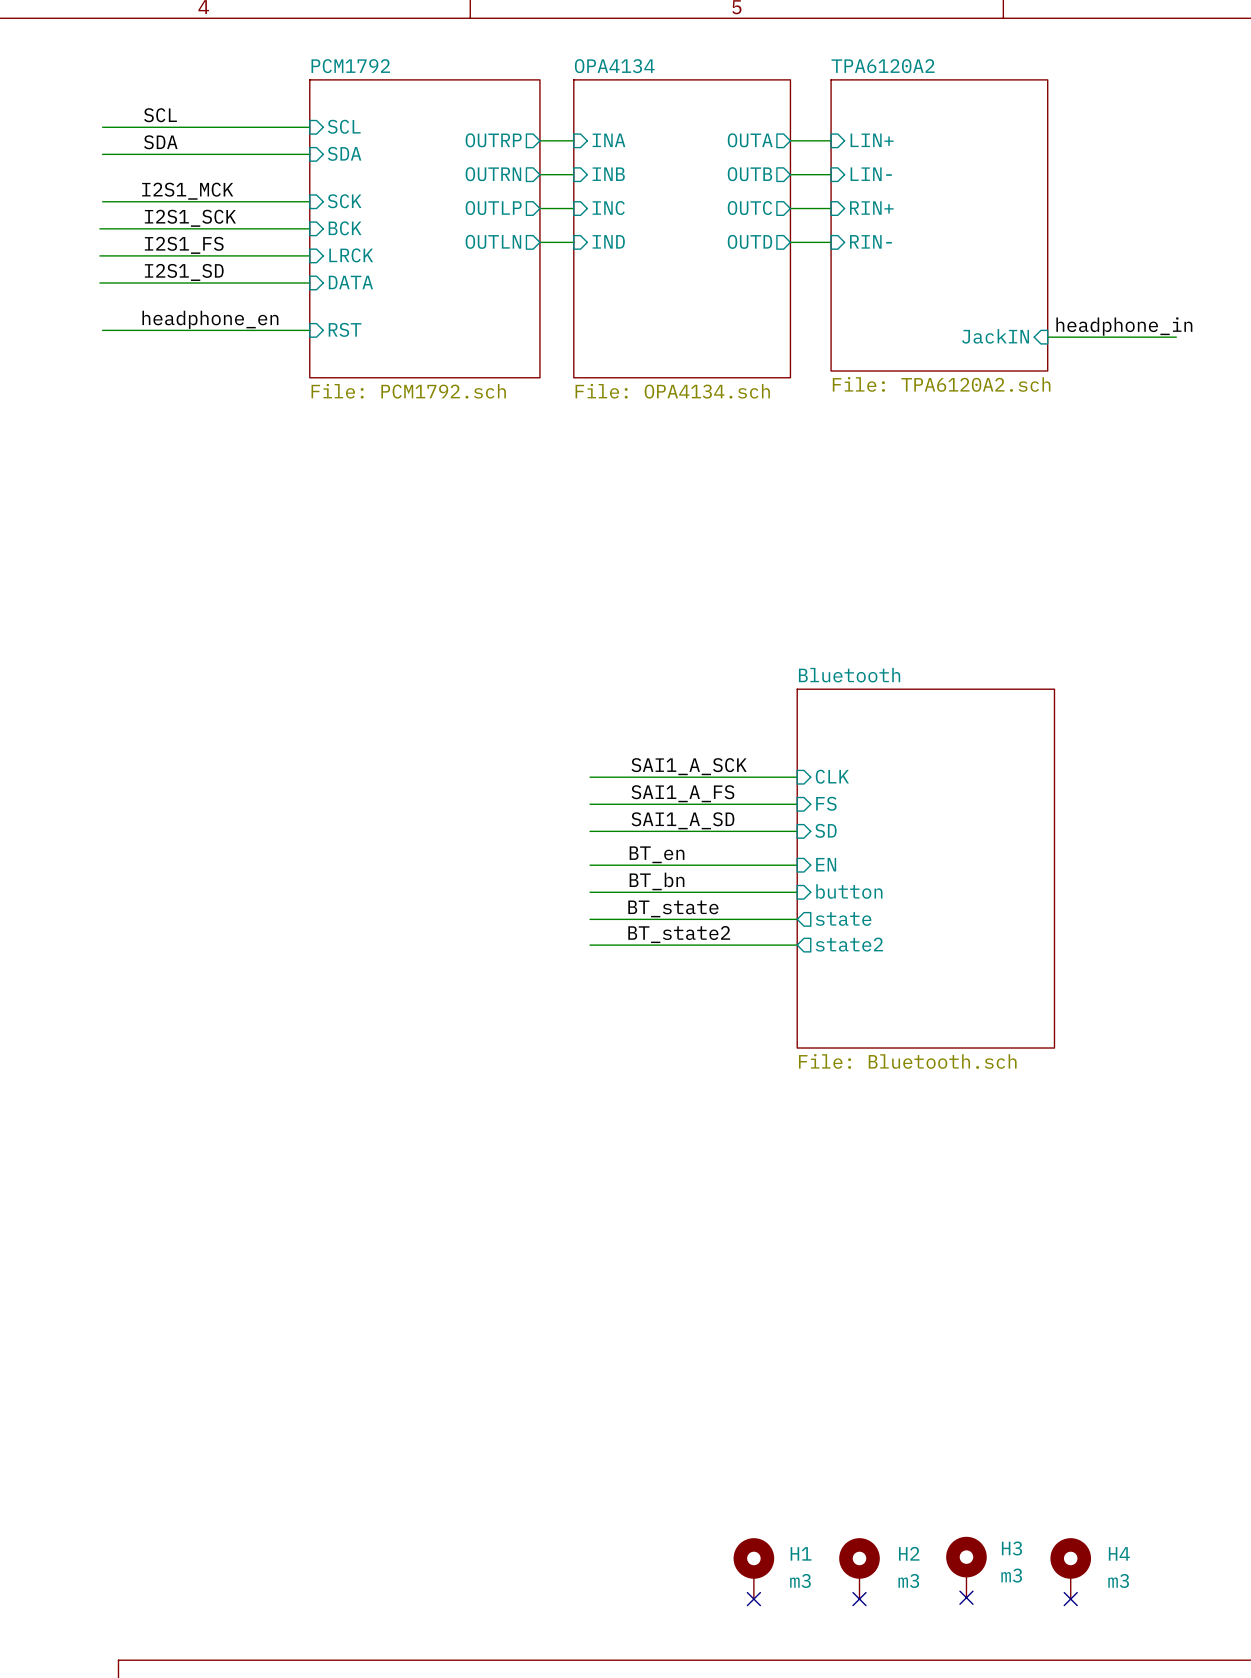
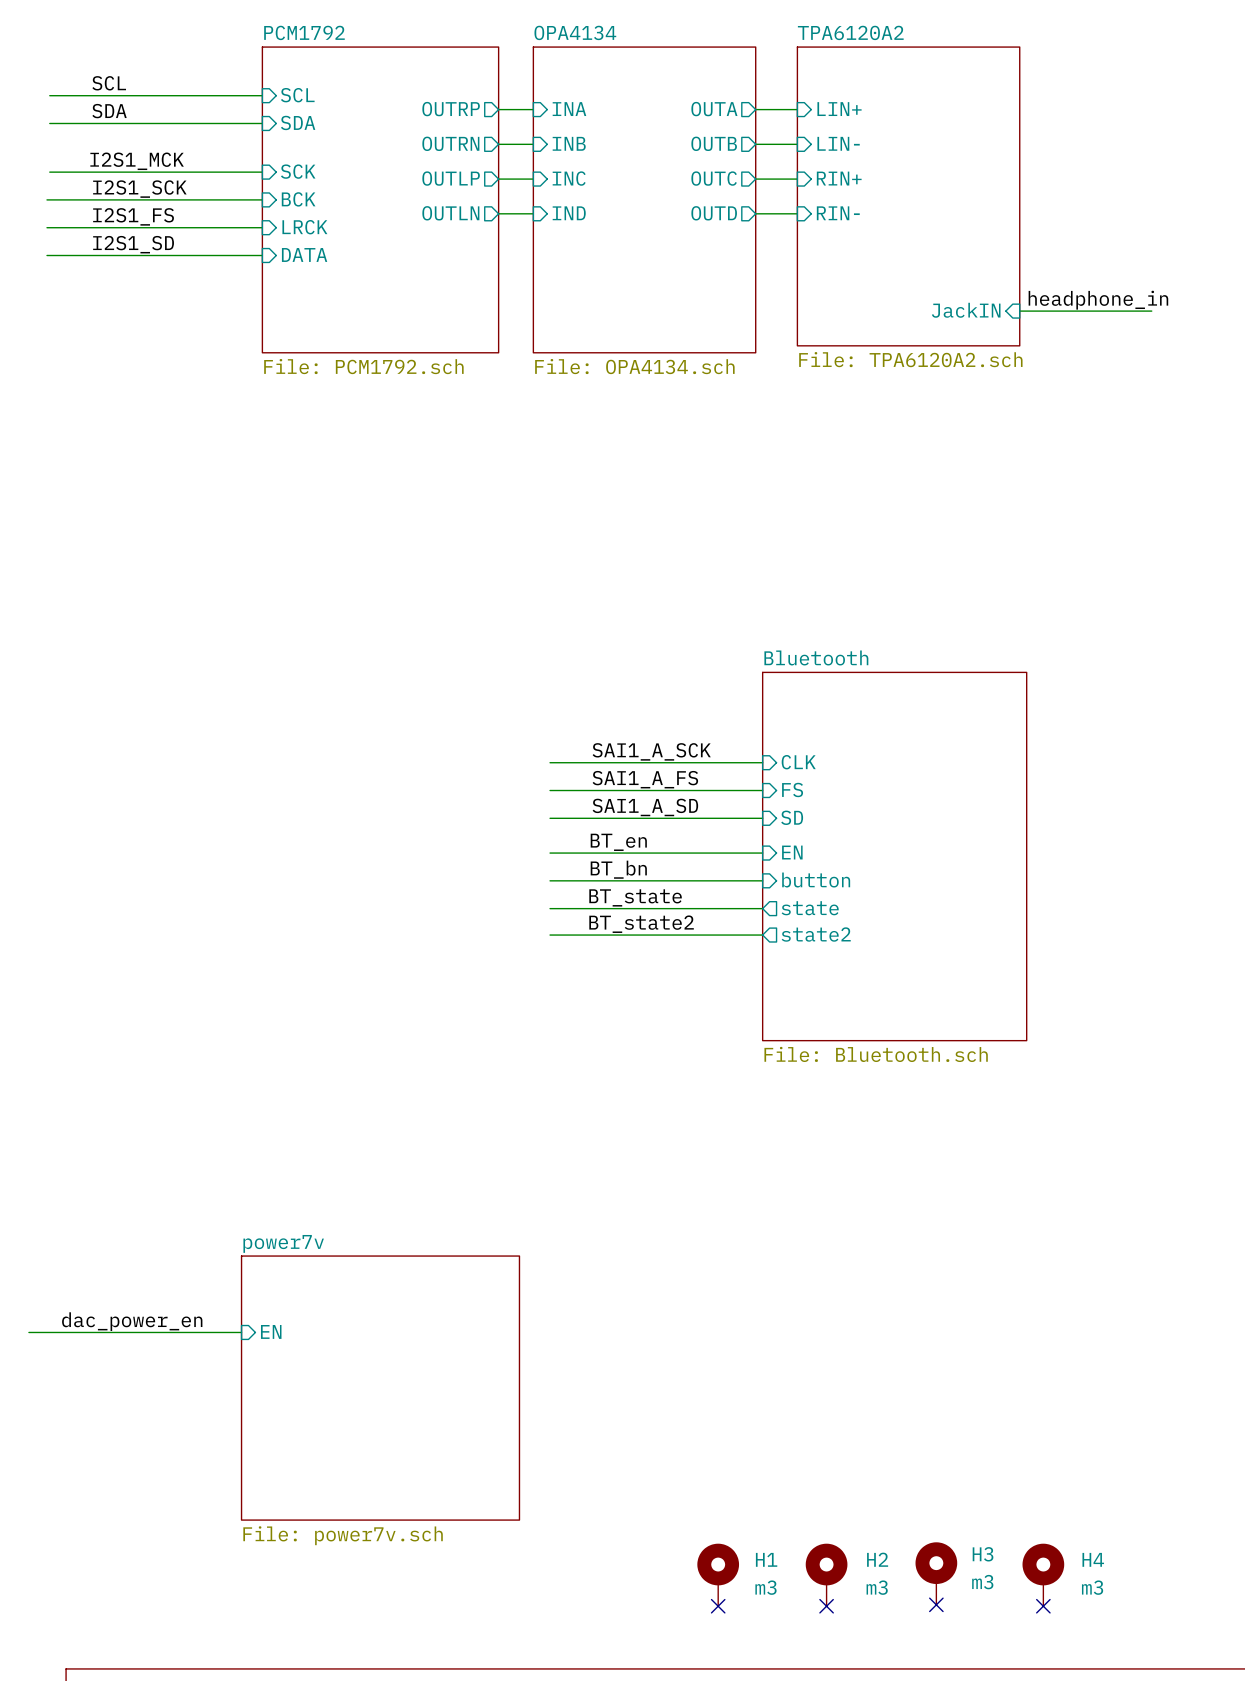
label: headphone_en (210, 319) -> none
sheet pin: RST (345, 329) -> none
wire: (102, 330) (309, 330) -> none
label: none -> dac_power_en (132, 1321)
sheet pin: none -> EN (271, 1331)
wire: none -> (28, 1332) (241, 1332)
sheet power7v: none -> File: power7v.sch (380, 1388)

